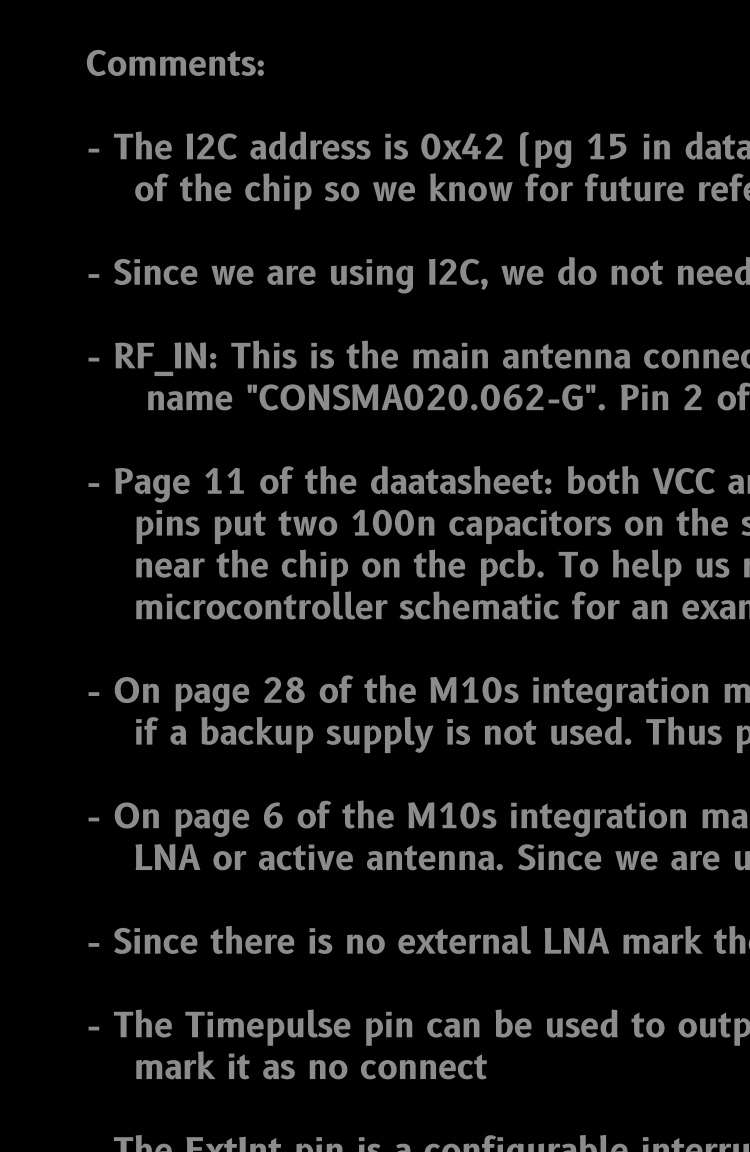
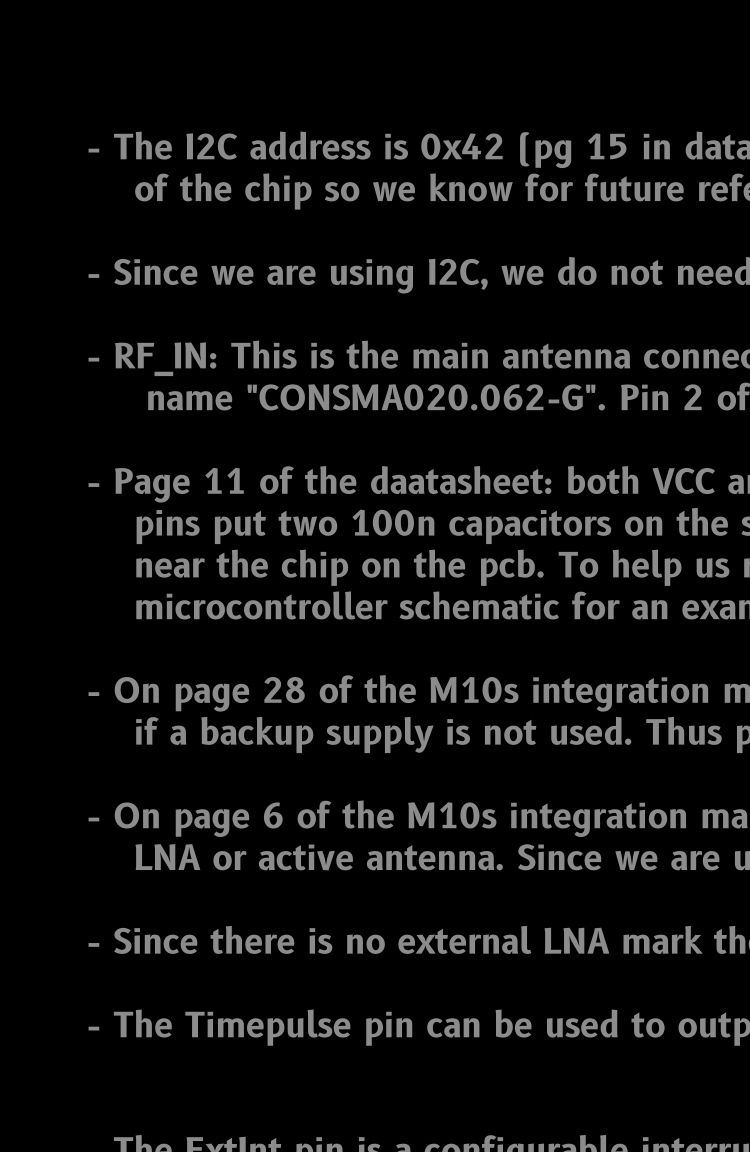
text: Comments: (175, 62) -> none
text: mark it as no connect (311, 1065) -> none

